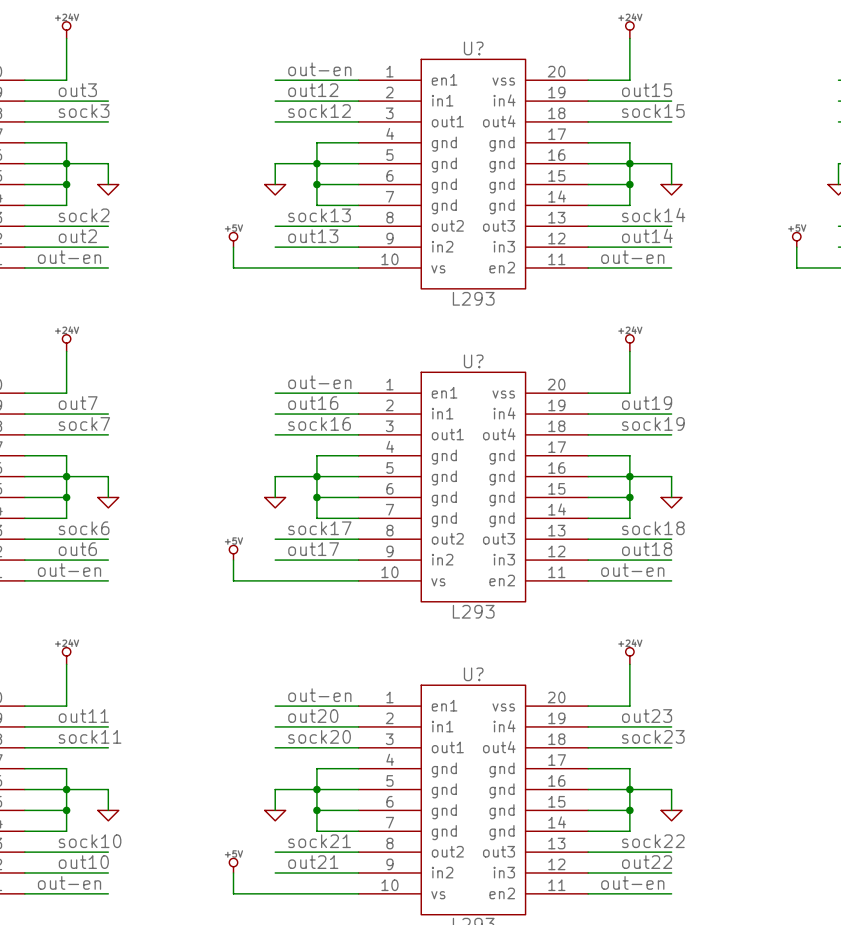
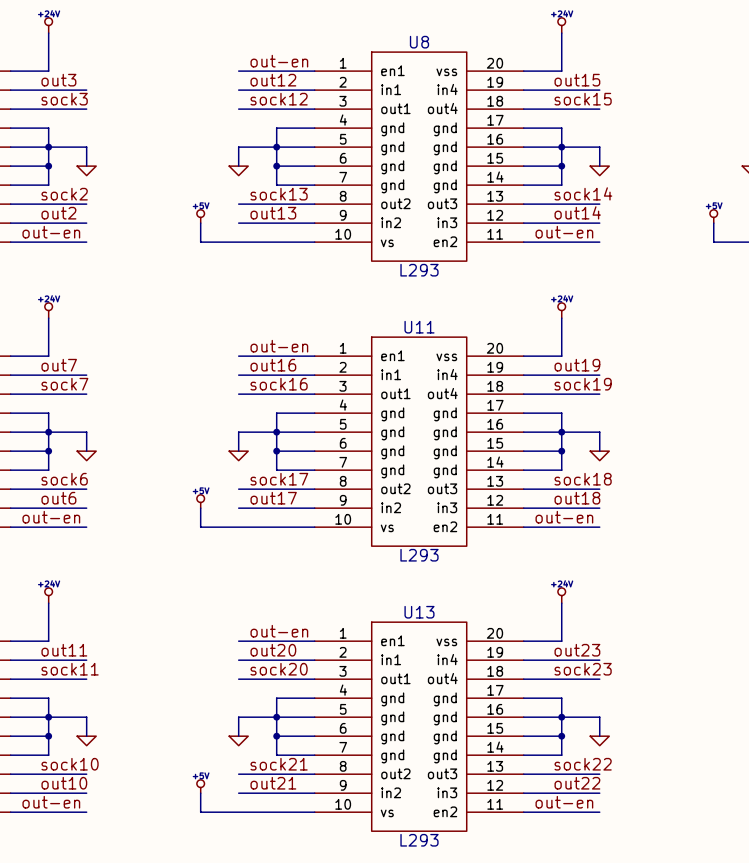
U? name: U? (473, 48) -> U8 (419, 42)
U? name: U? (473, 361) -> U11 (419, 327)
U? name: U? (473, 674) -> U13 (419, 612)

